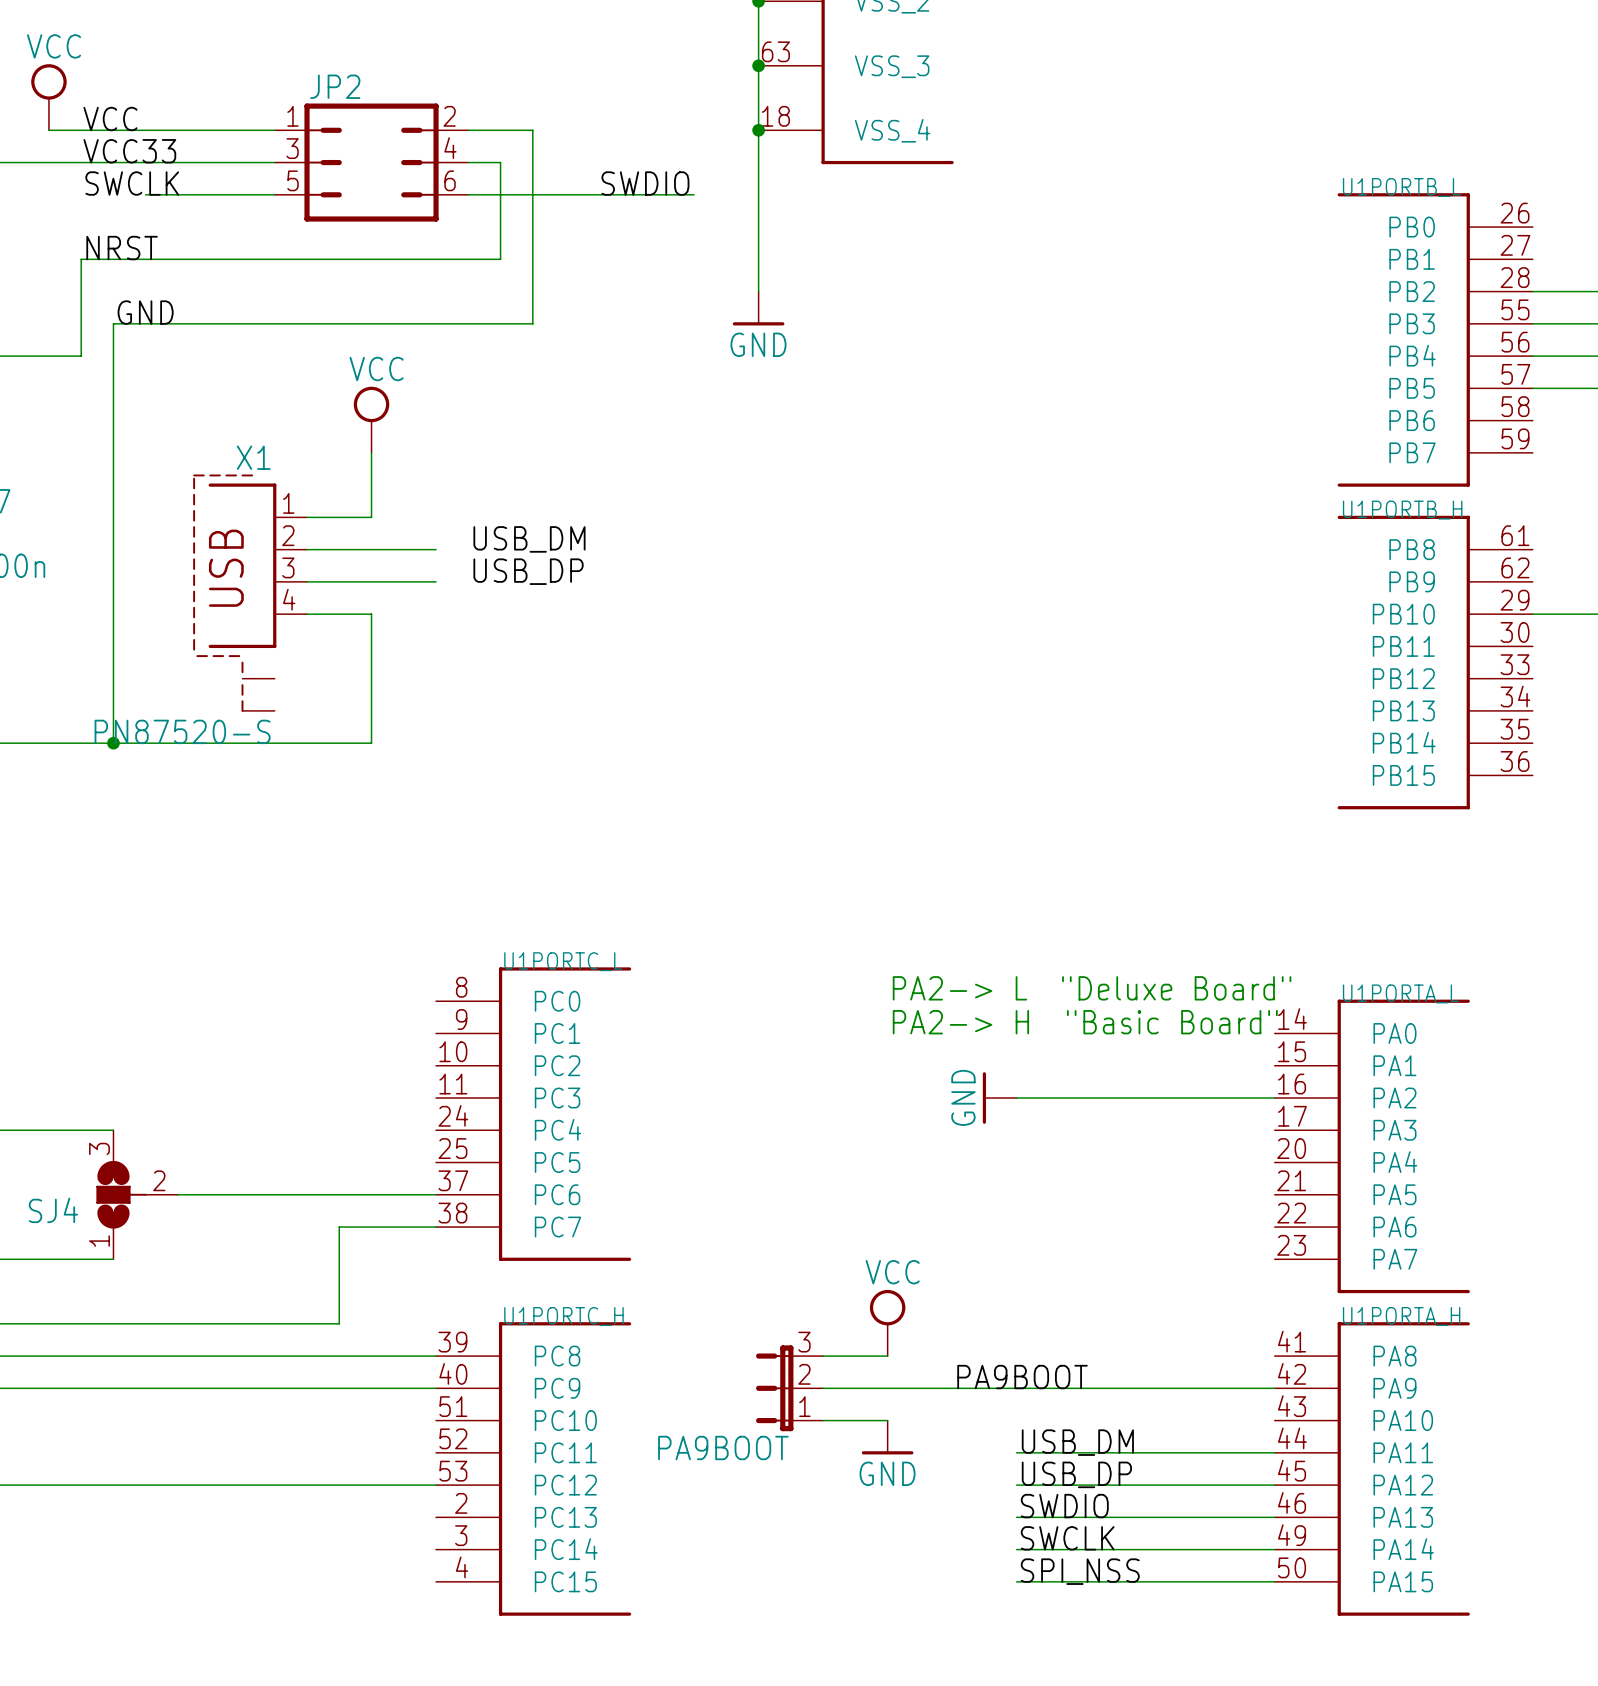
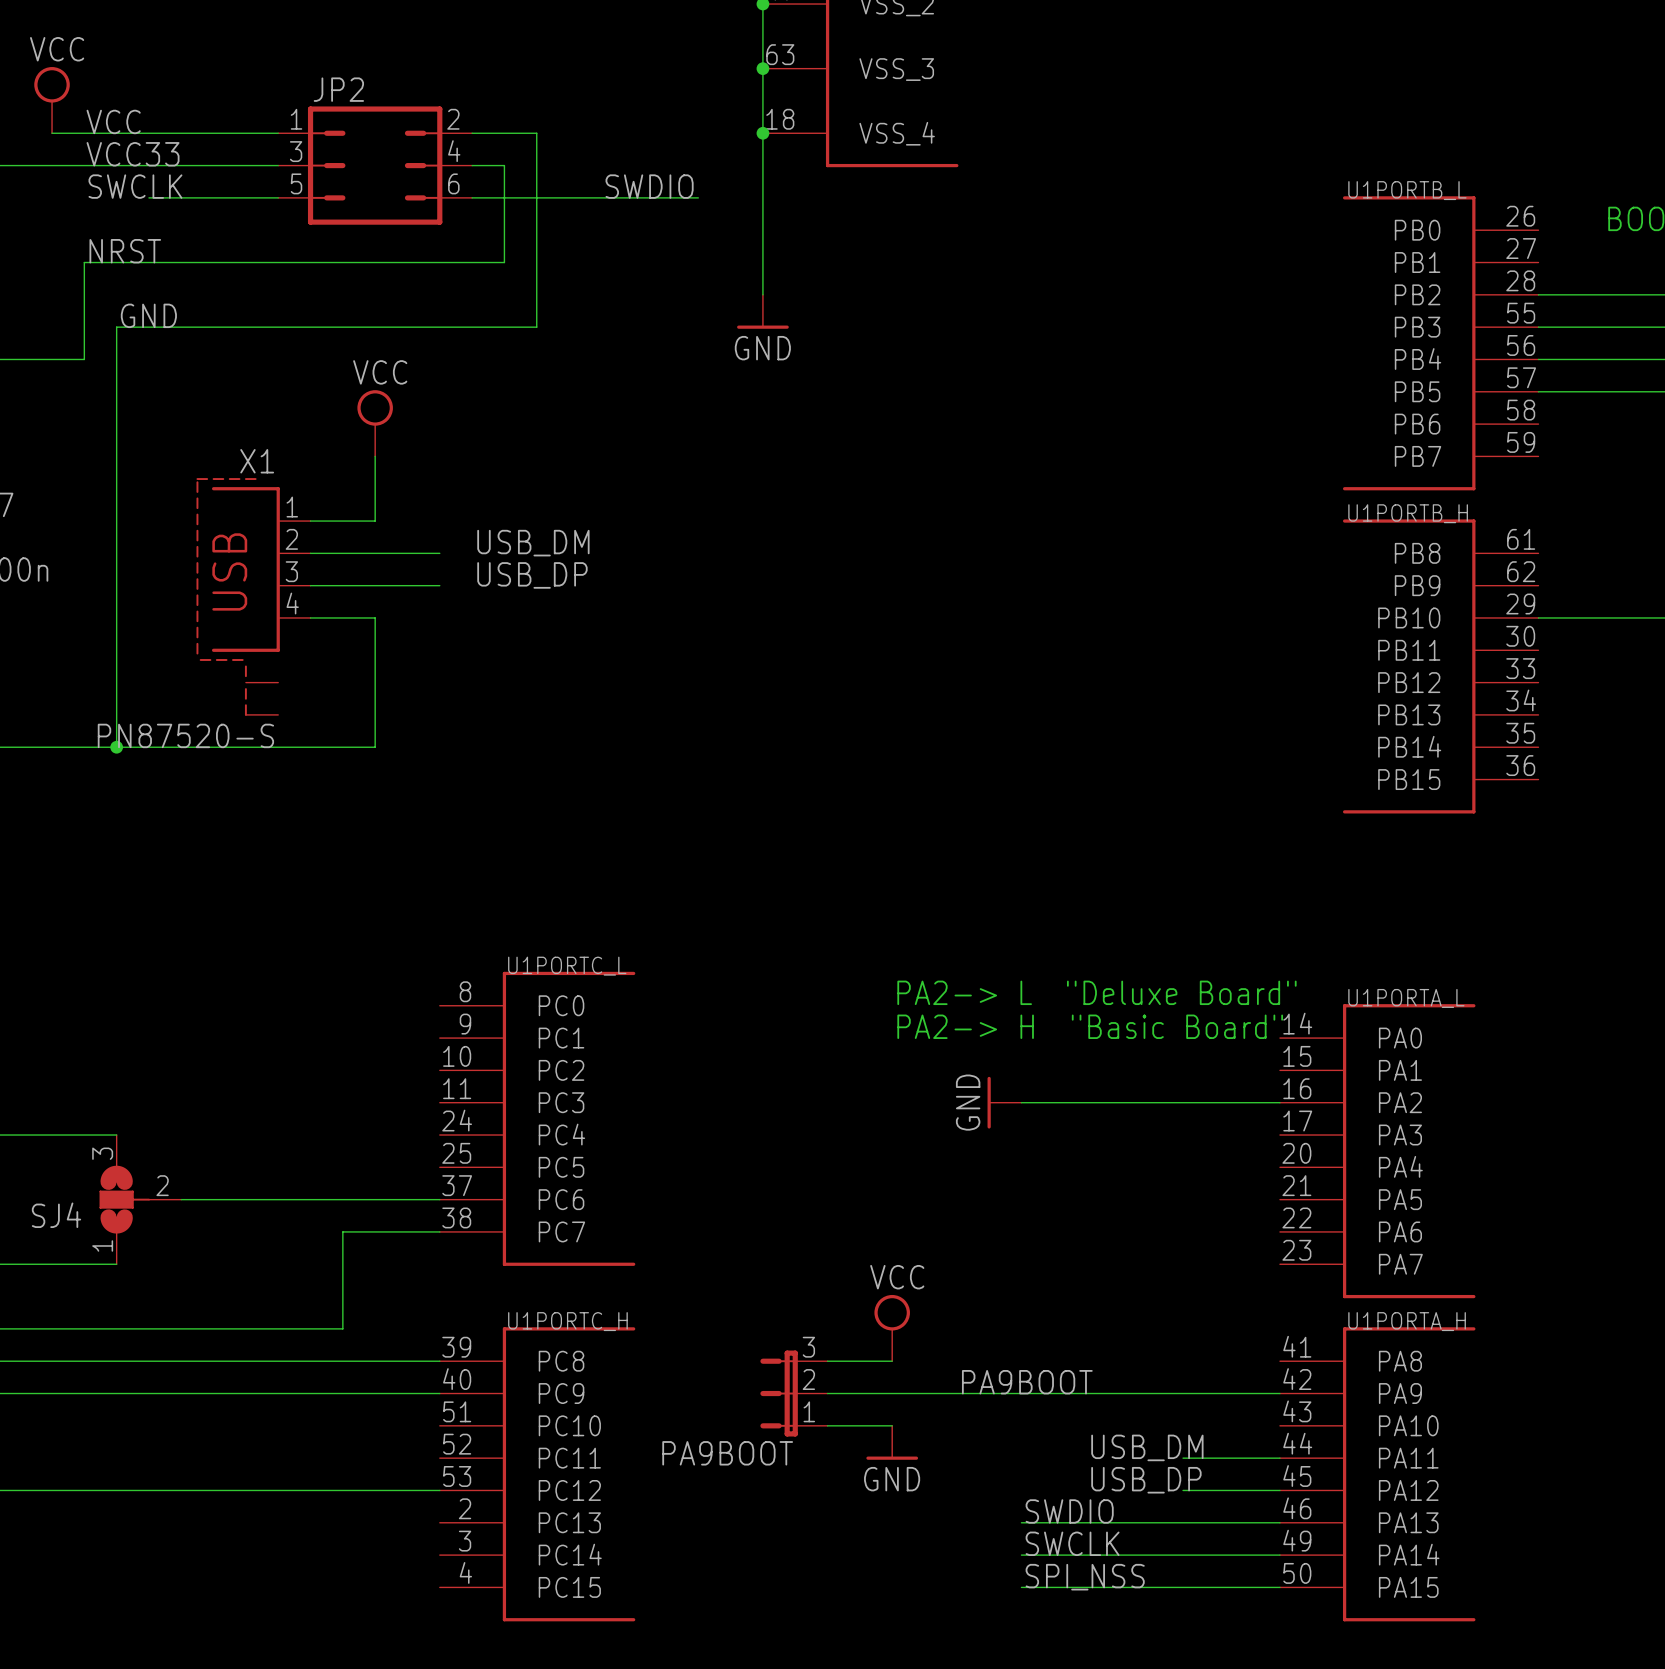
label position: USB_DM (1077, 1442) -> USB_DM (1147, 1447)
wire: (1016, 1452) (1177, 1452) -> none
label position: USB_DP (1076, 1474) -> USB_DP (1146, 1480)
wire: (1016, 1485) (1177, 1485) -> none

